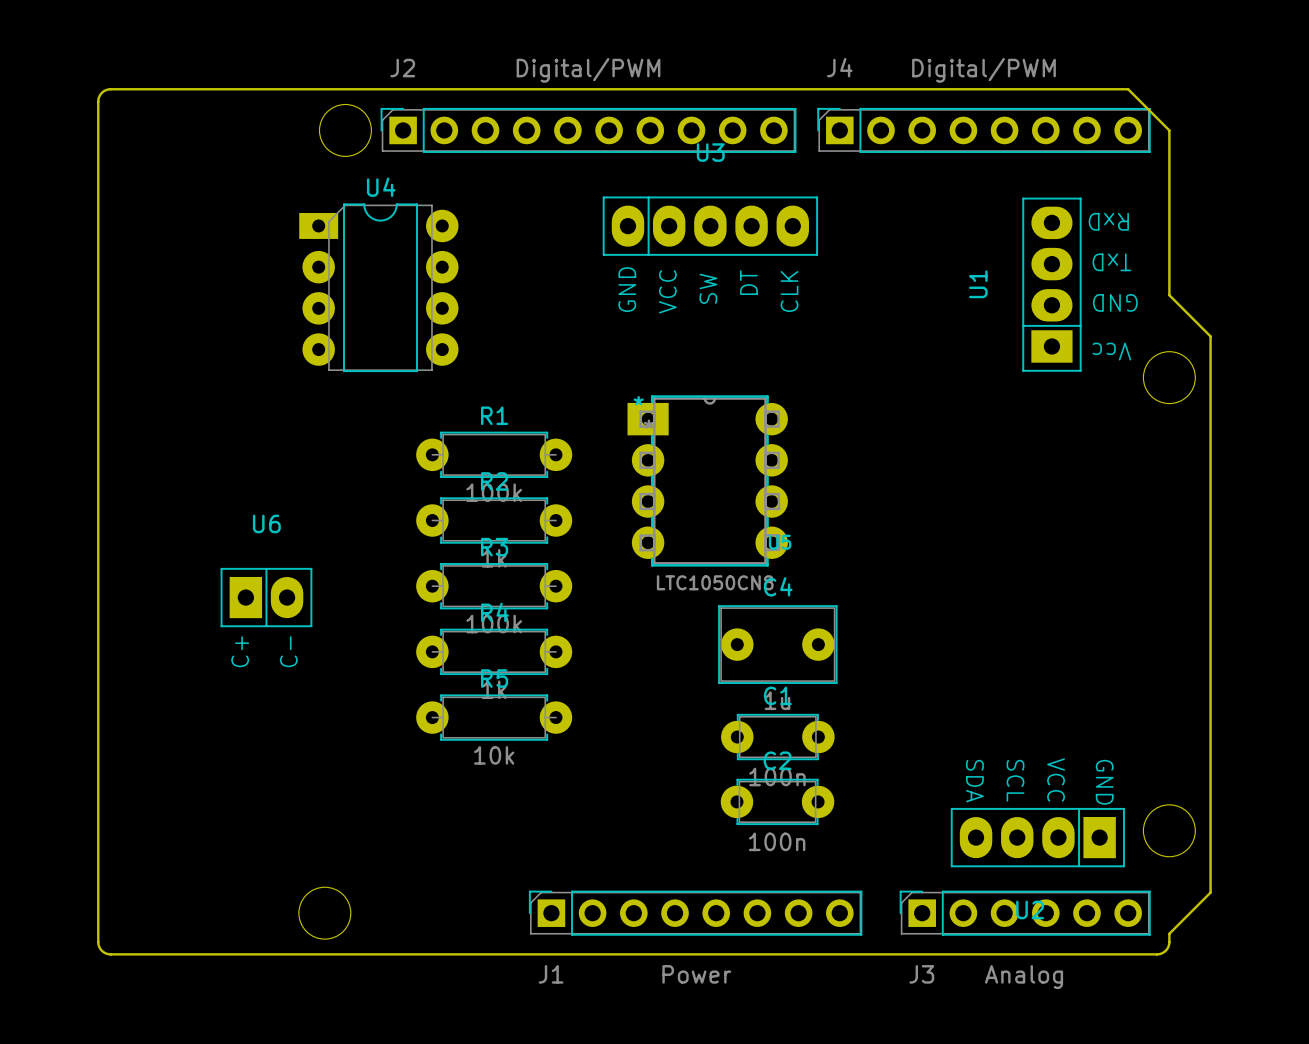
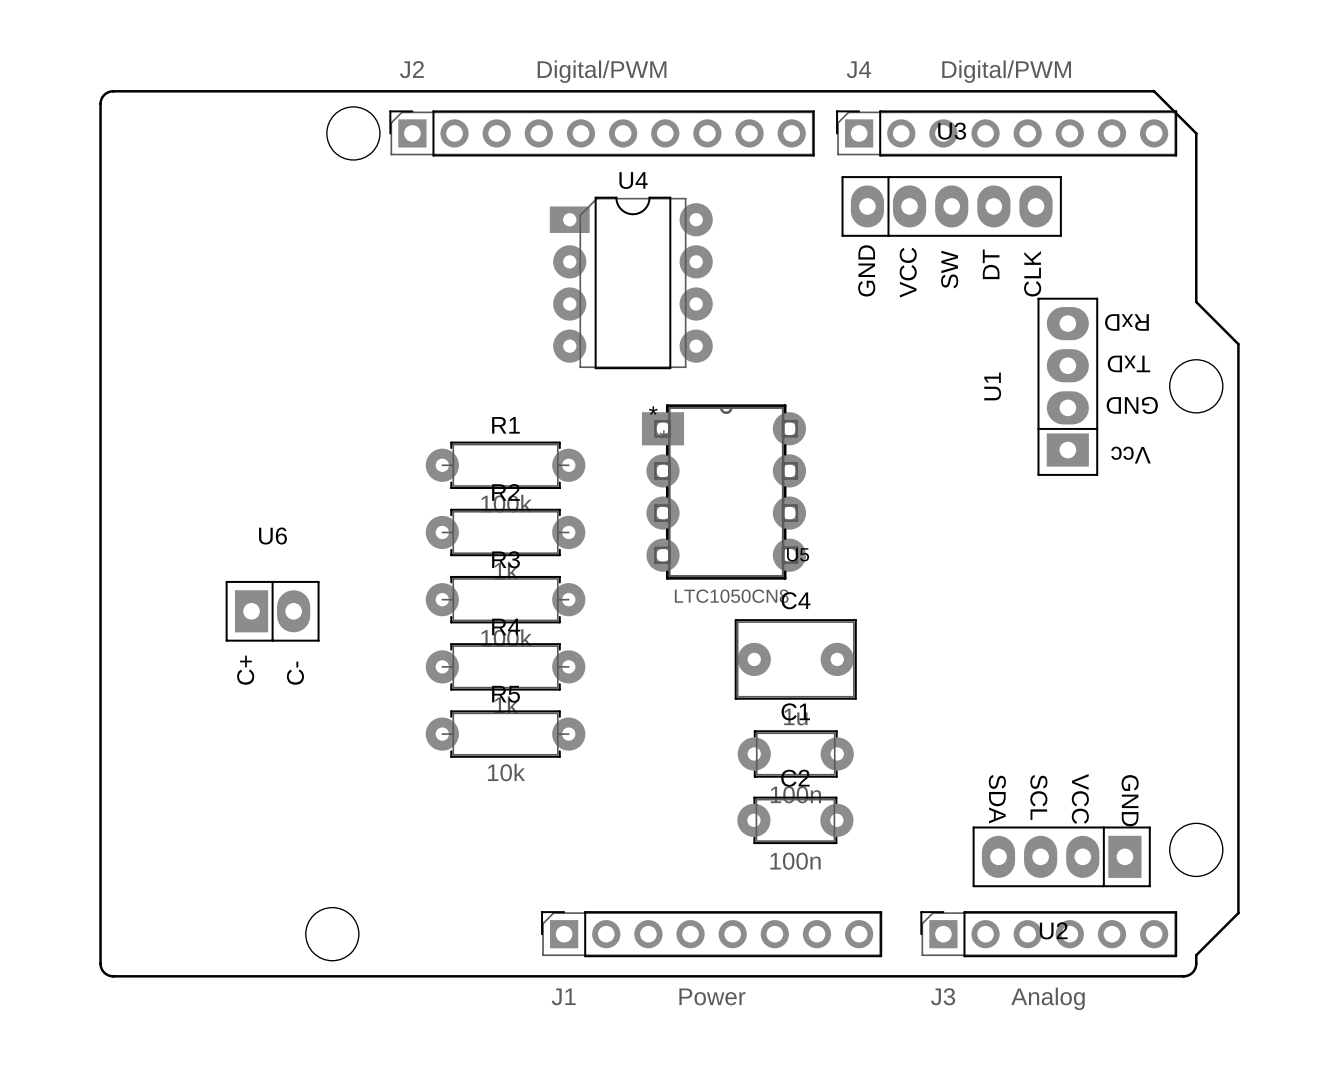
U3 position: (710, 226) -> (951, 206)
U1 position: (1051, 284) -> (1067, 386)
U4 position: (378, 287) -> (631, 282)

